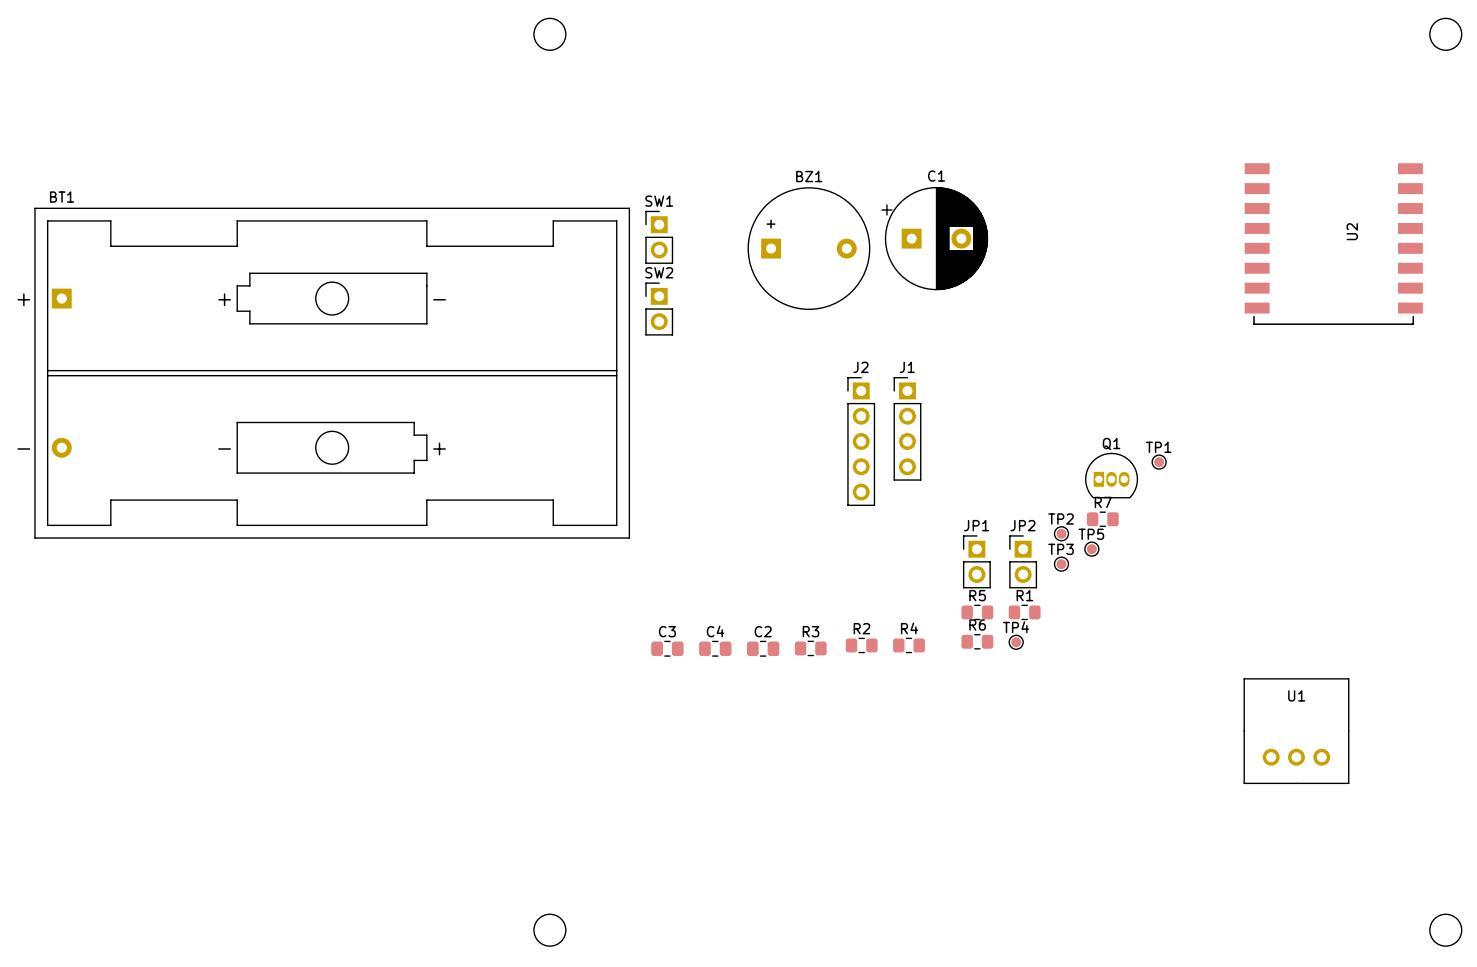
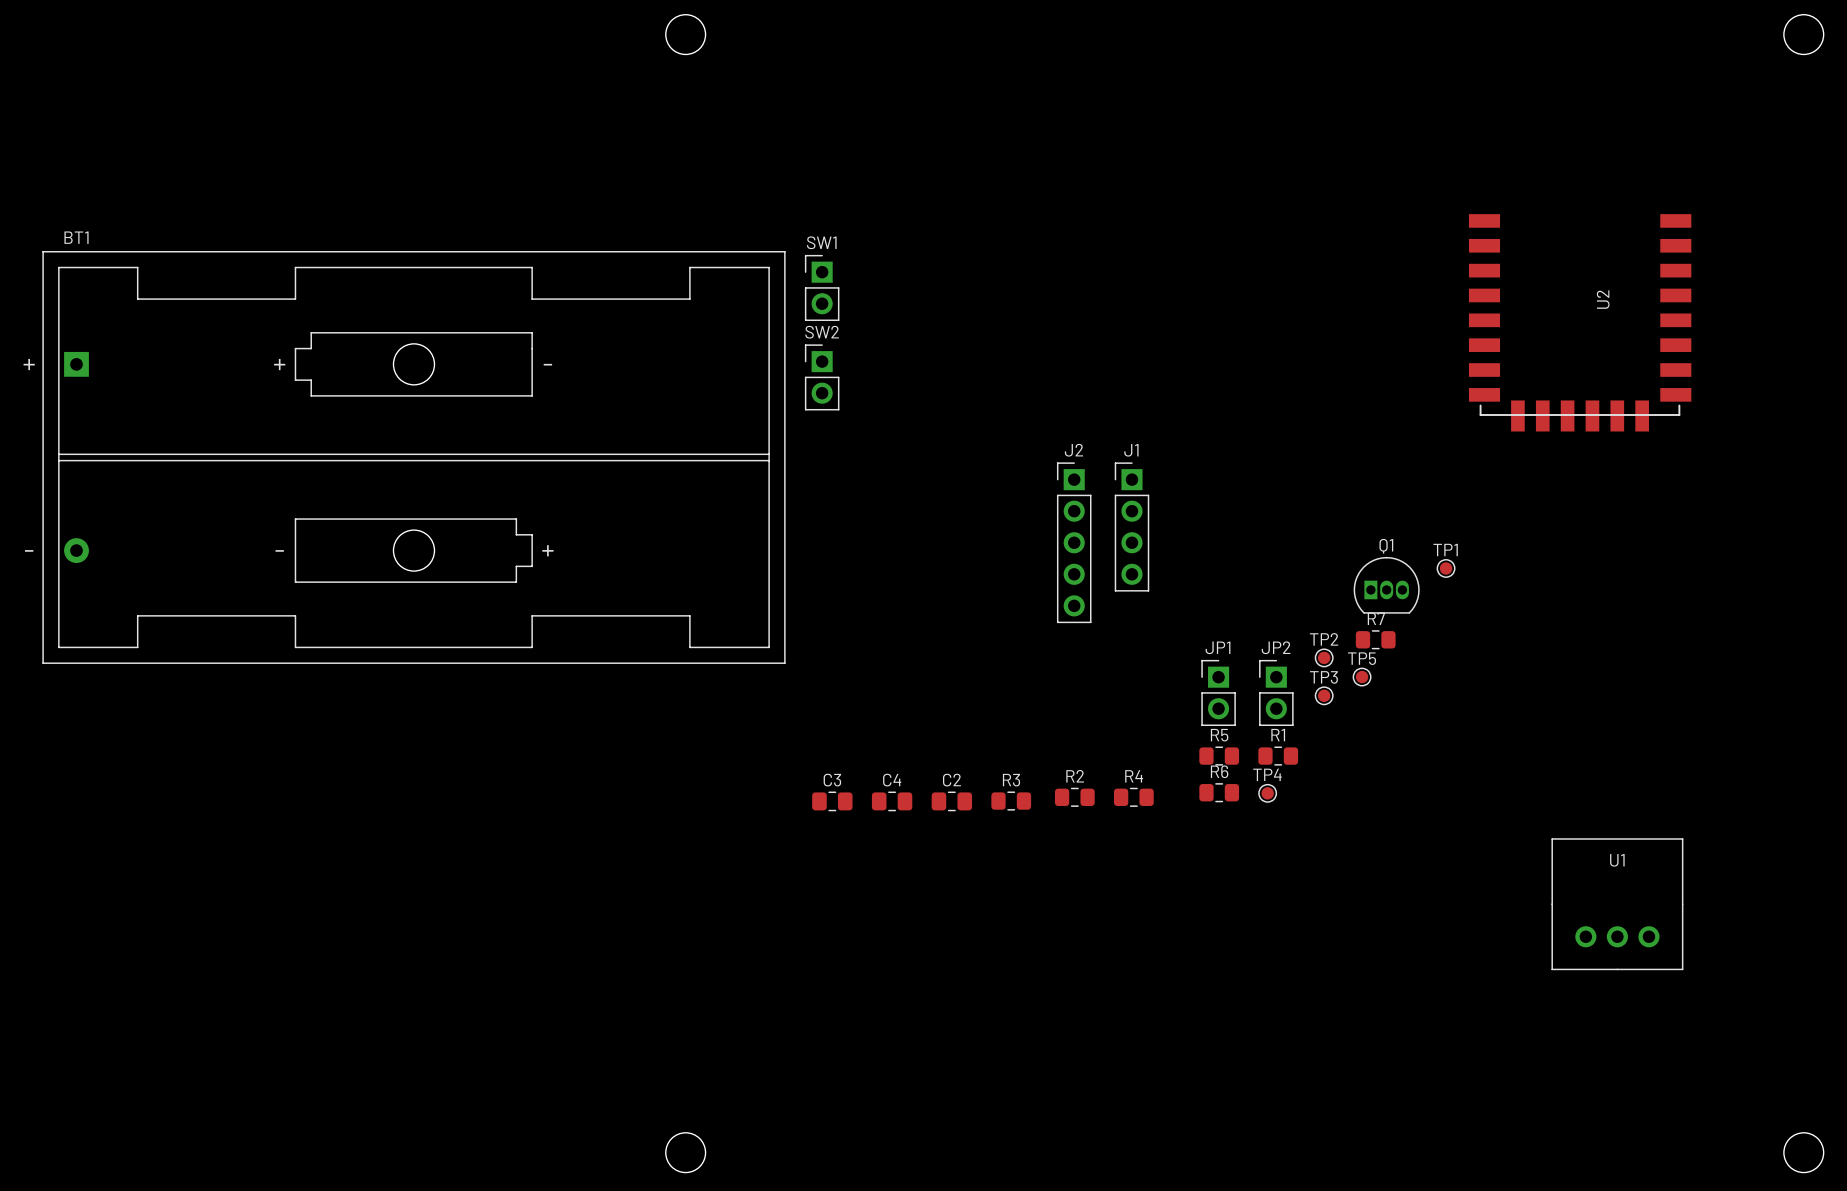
U2 footprint: [1244, 163, 1423, 325] -> [1468, 214, 1692, 432]
C1: (934, 238) -> none
BZ1: (808, 248) -> none

